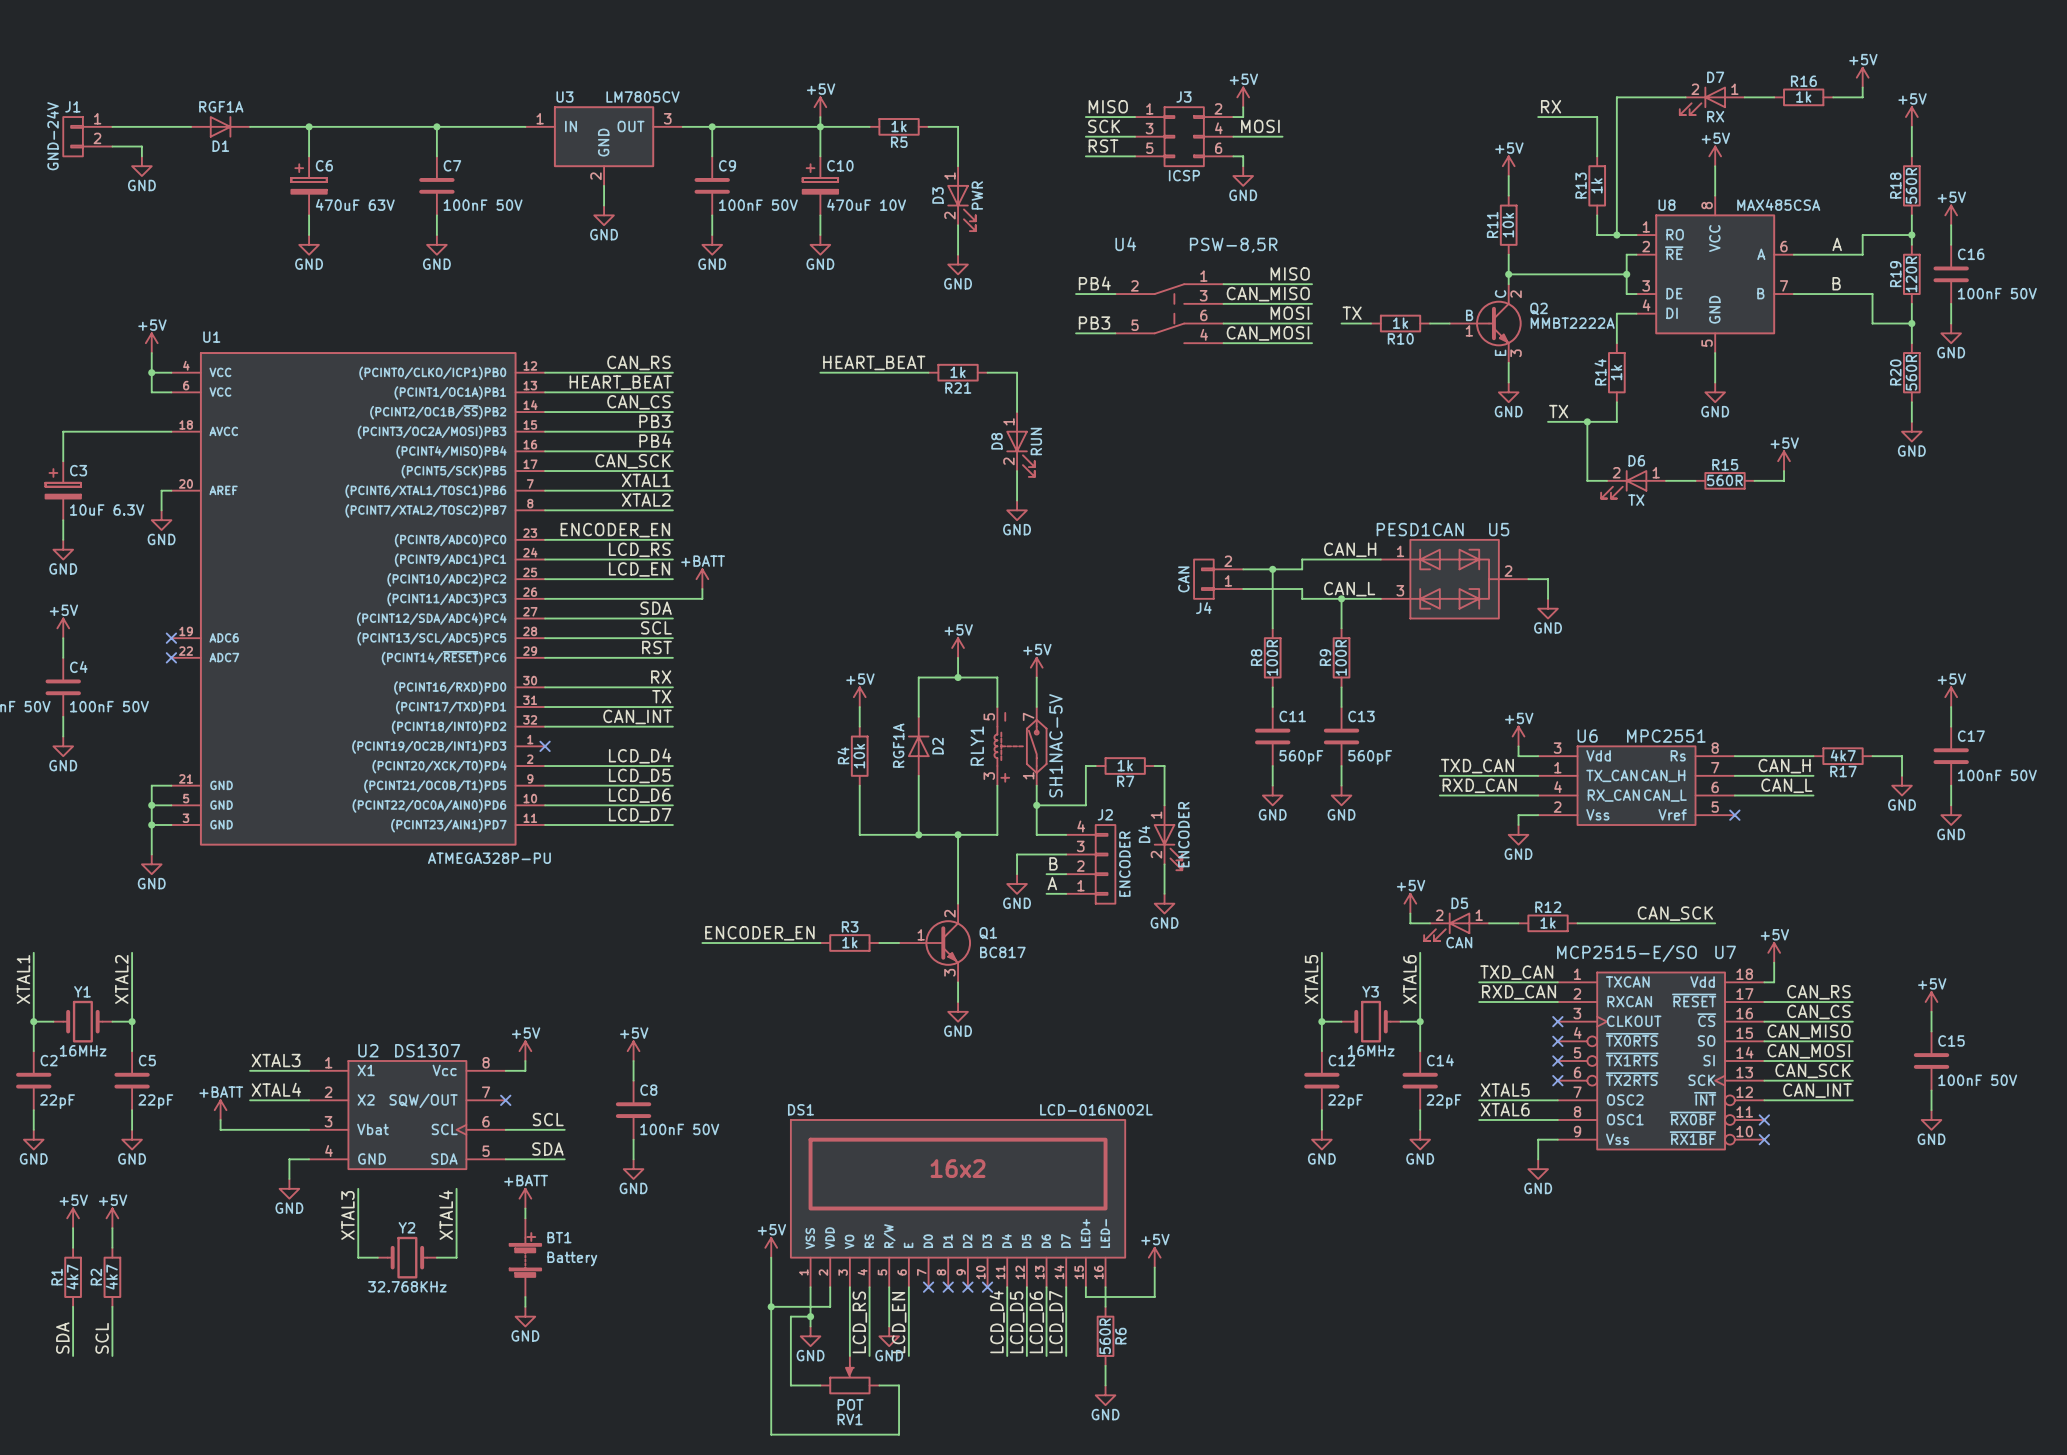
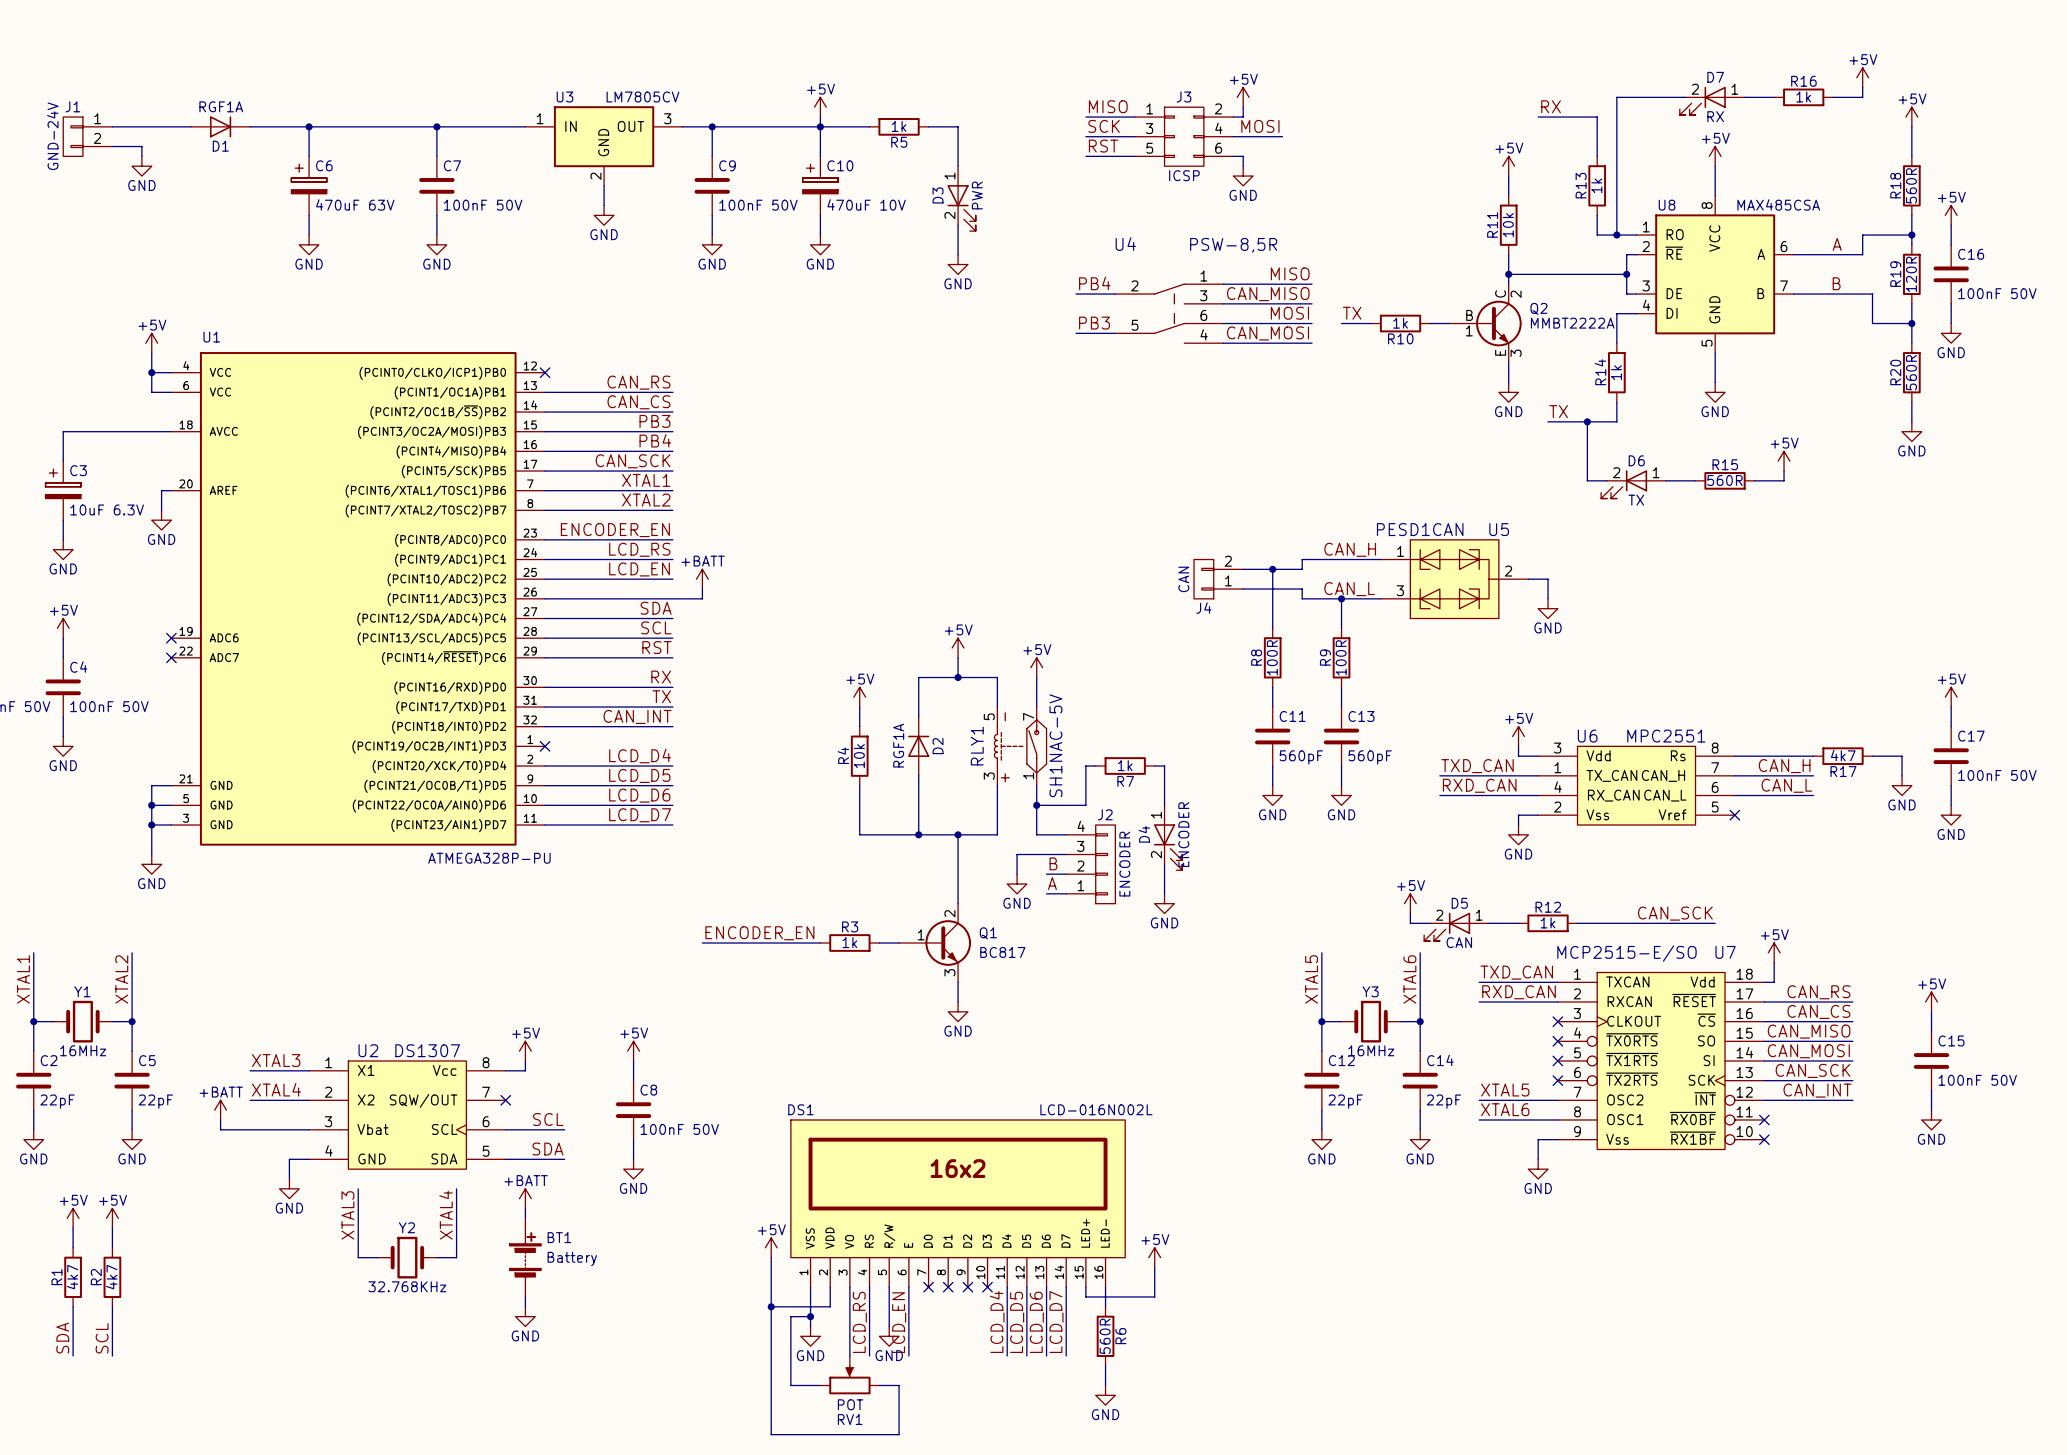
label: CAN_RS (638, 362) -> none
label: HEART_BEAT (874, 362) -> none
wire: (545, 372) (672, 372) -> none
no-connect mark: none -> (545, 372)
wire: (820, 372) (928, 372) -> none
R21: 1k (958, 372) -> none
wire: (987, 372) (1017, 372) (1017, 412) -> none
label: HEART_BEAT (620, 382) -> CAN_RS (638, 382)
D8: RUN (1020, 444) -> none
wire: (1017, 471) (1017, 500) -> none
power symbol: GND (1017, 510) -> none

